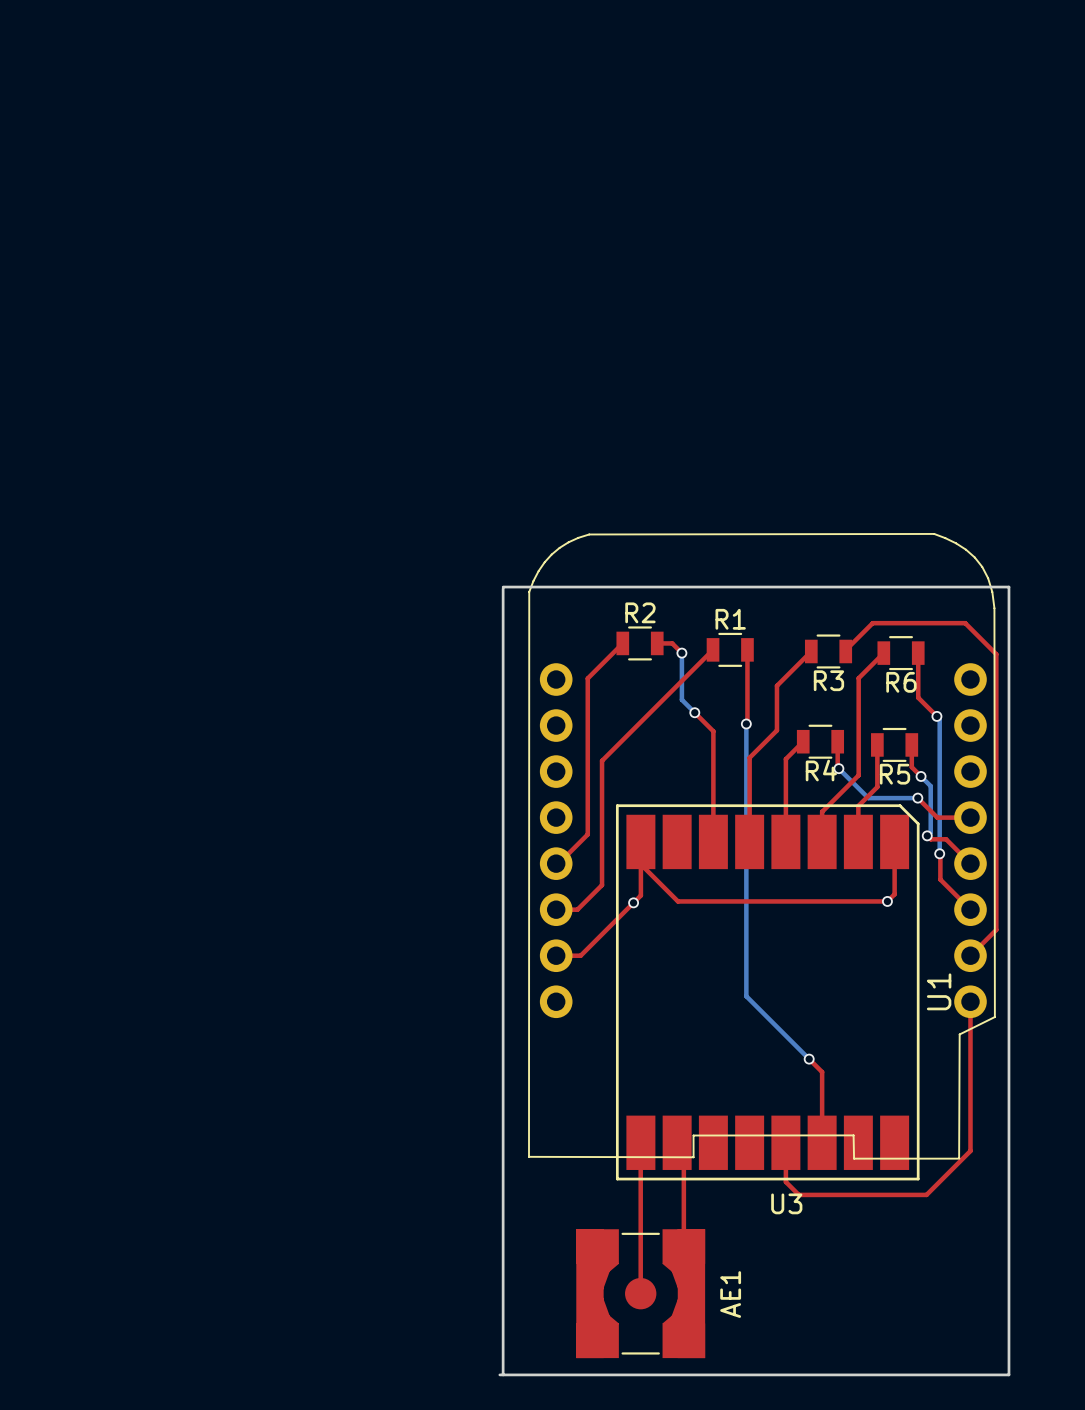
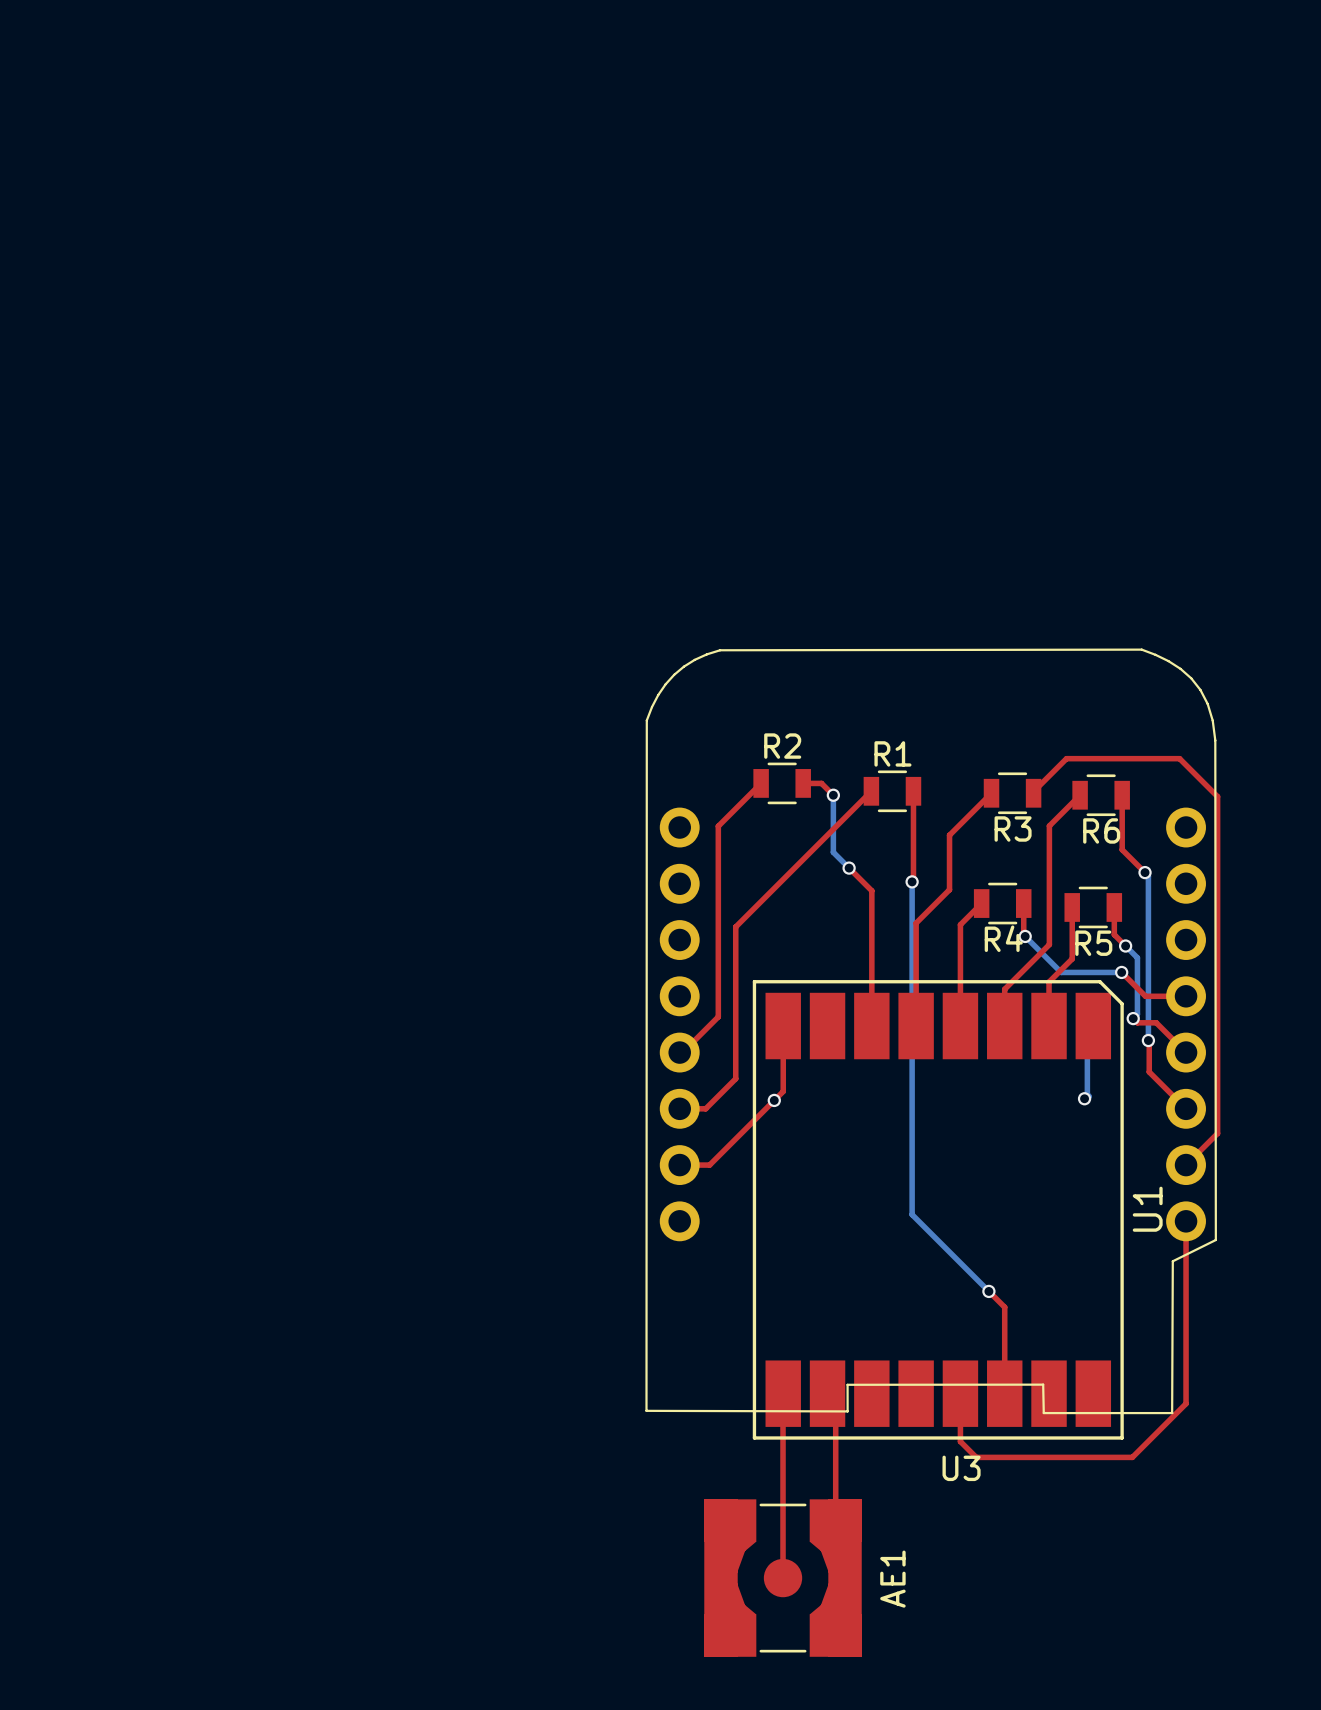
board edge: (503, 587) (1008, 587) (1008, 1374) (499, 1374) -> none
board edge: (503, 588) (503, 1374) -> none
top track: (894, 841) (894, 894) (887, 901) (677, 901) (640, 864) -> none
bottom track: none -> (1087, 1031) (1087, 1094) (1089, 1096)

